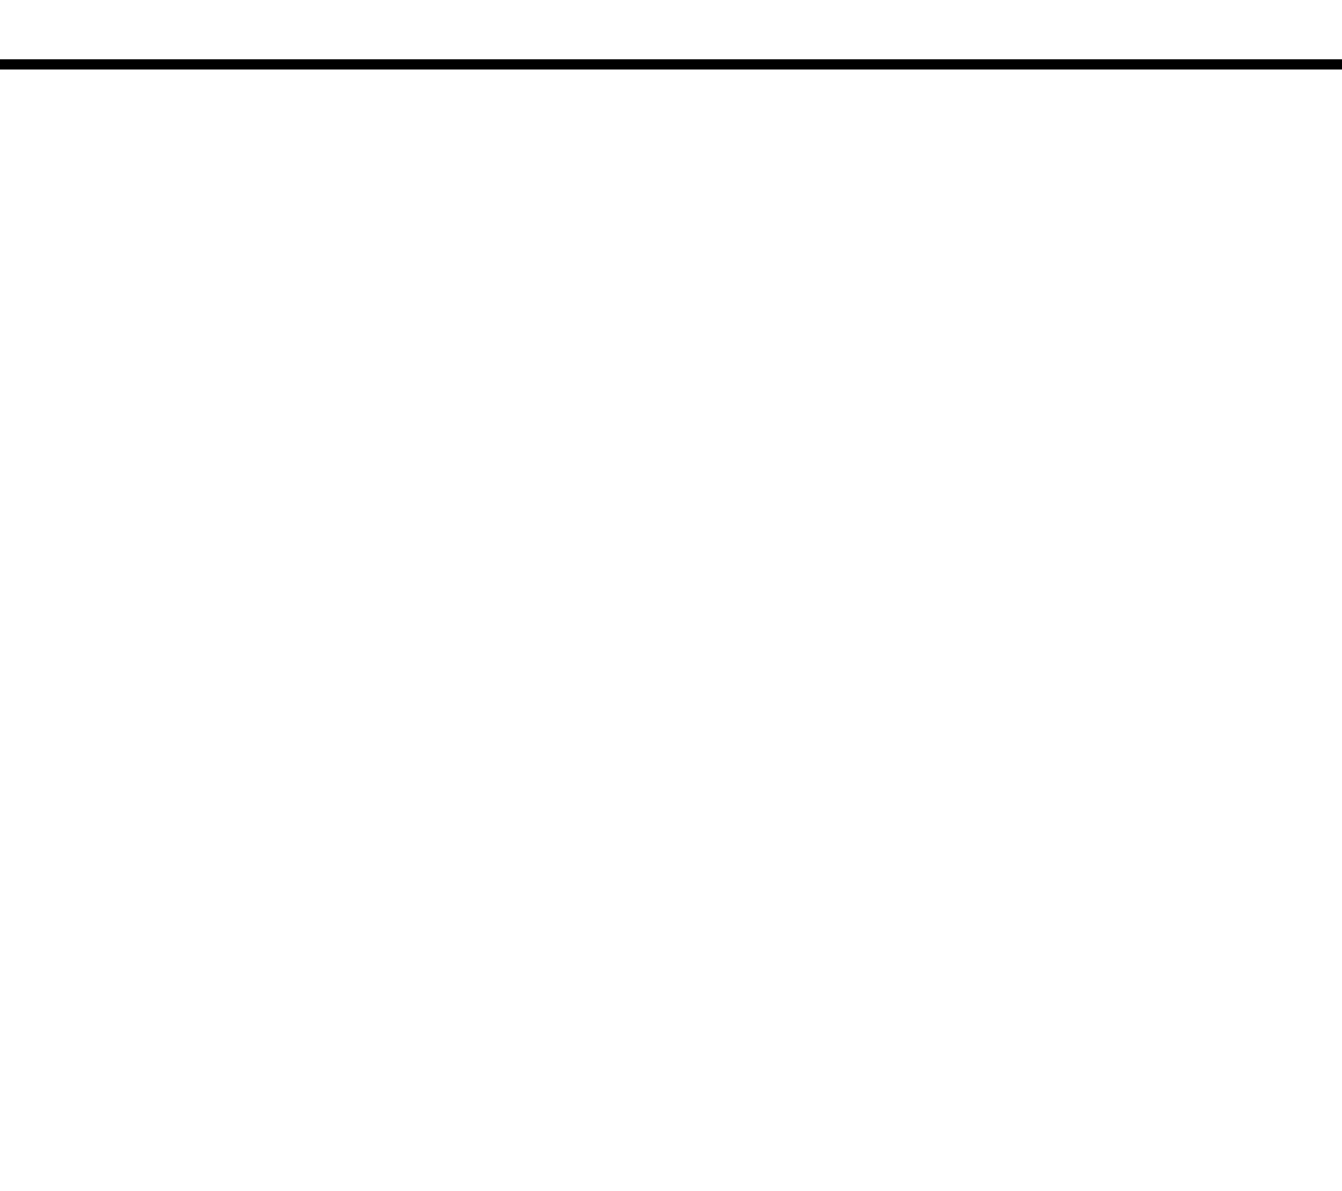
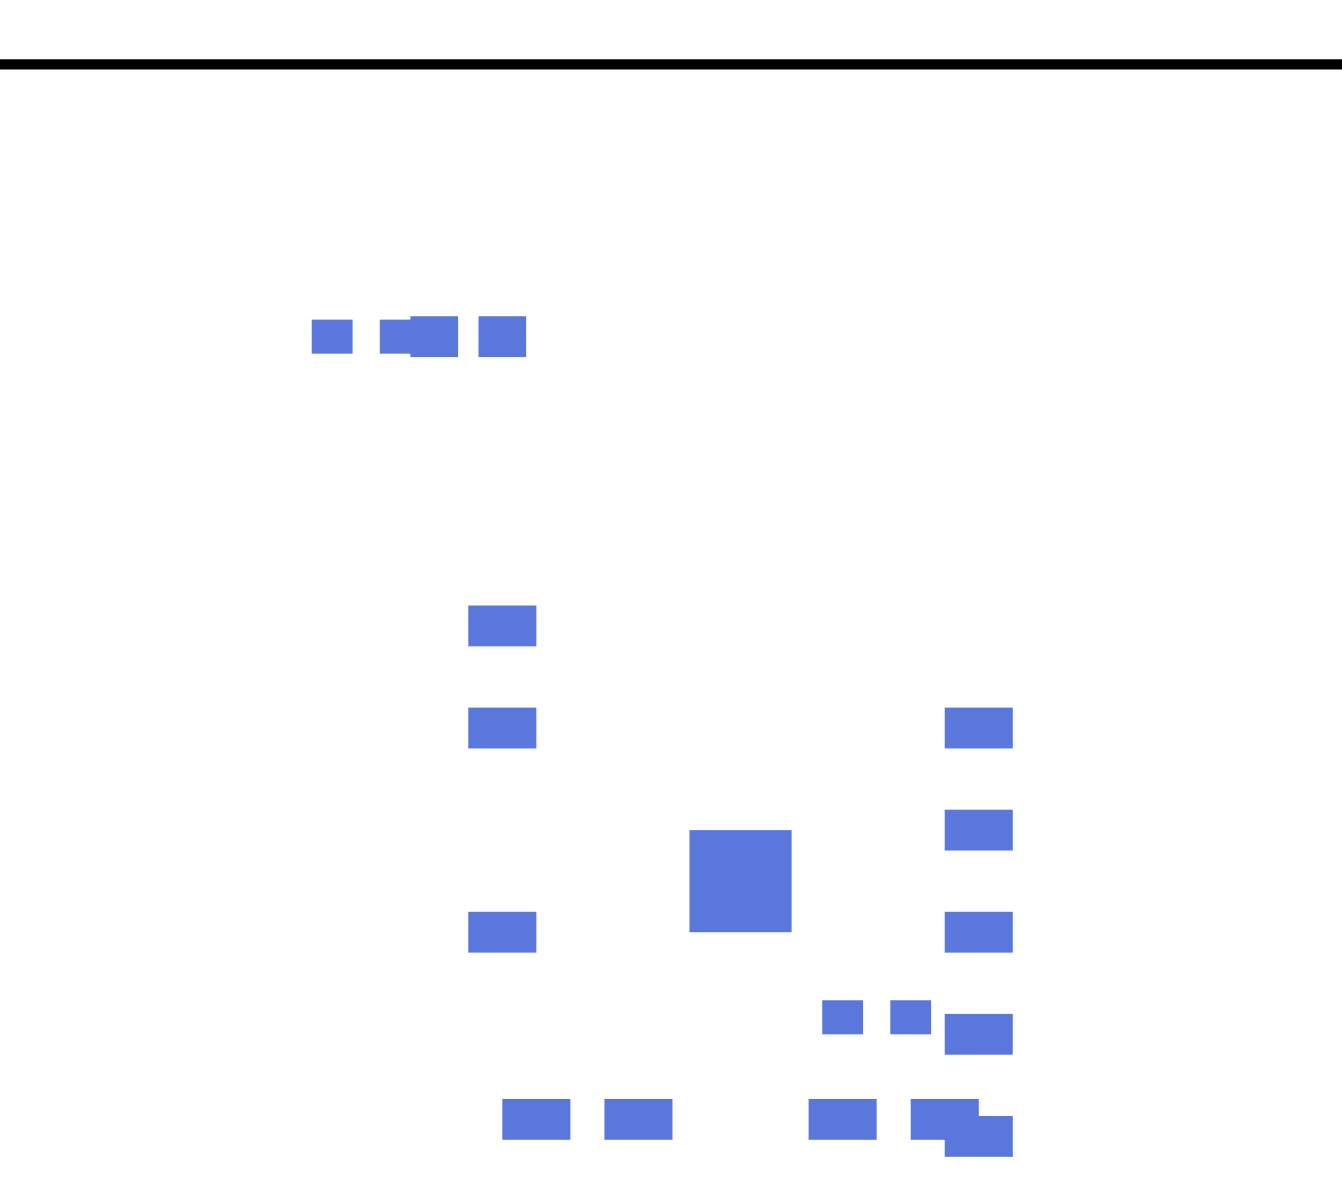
part: none -> (366, 336)
part: none -> (468, 336)
part: none -> (740, 881)
part: none -> (876, 1017)

